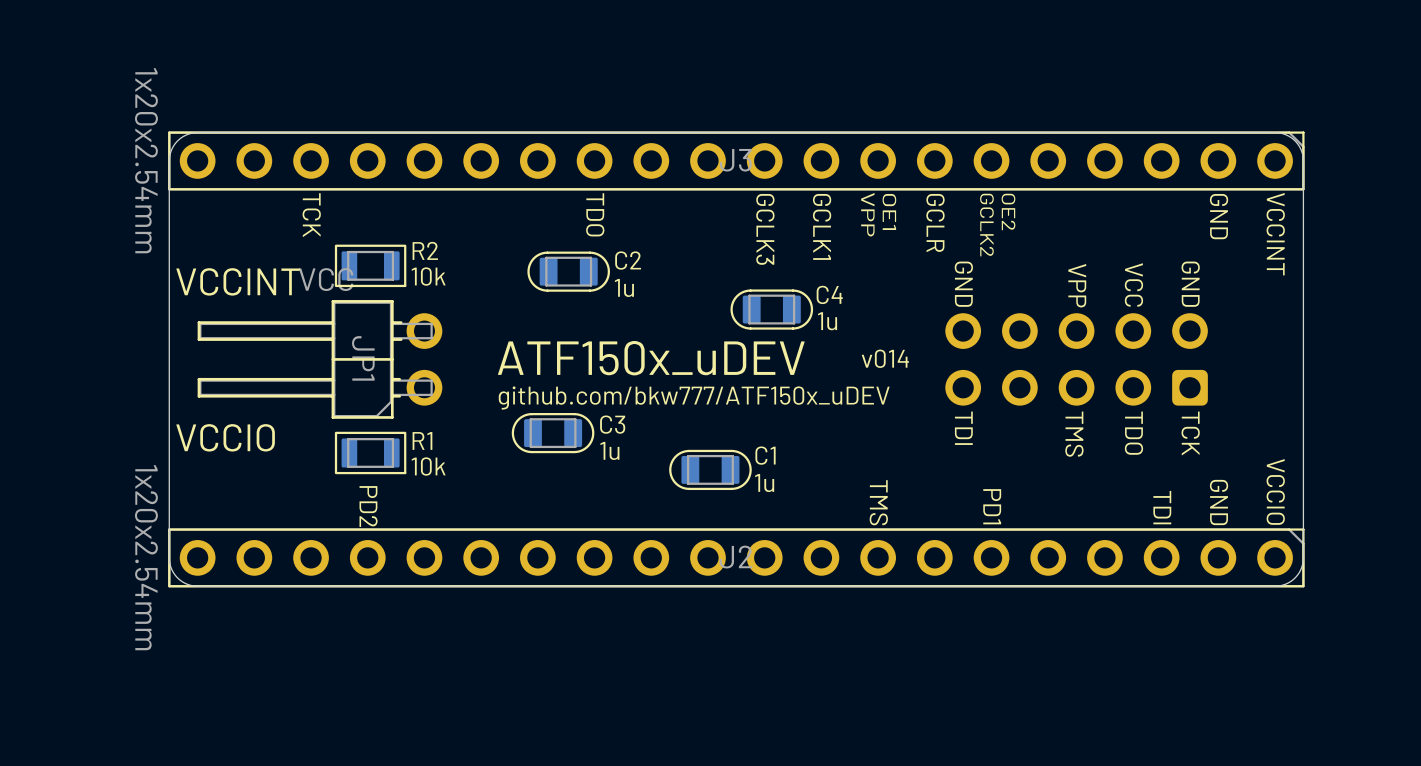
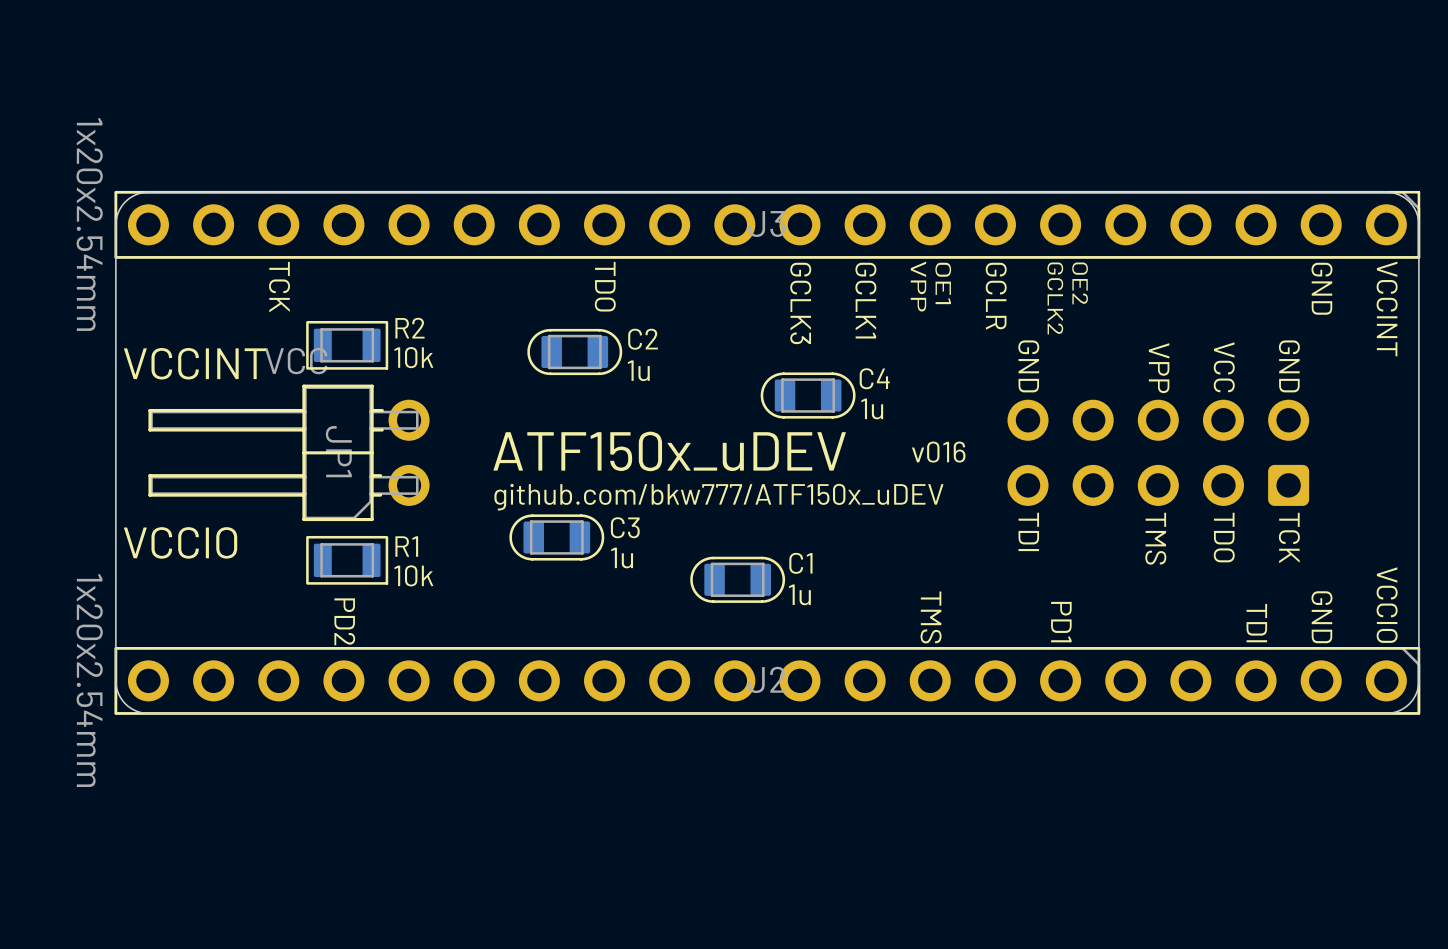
text: v014 (885, 358) -> v016 (938, 452)

